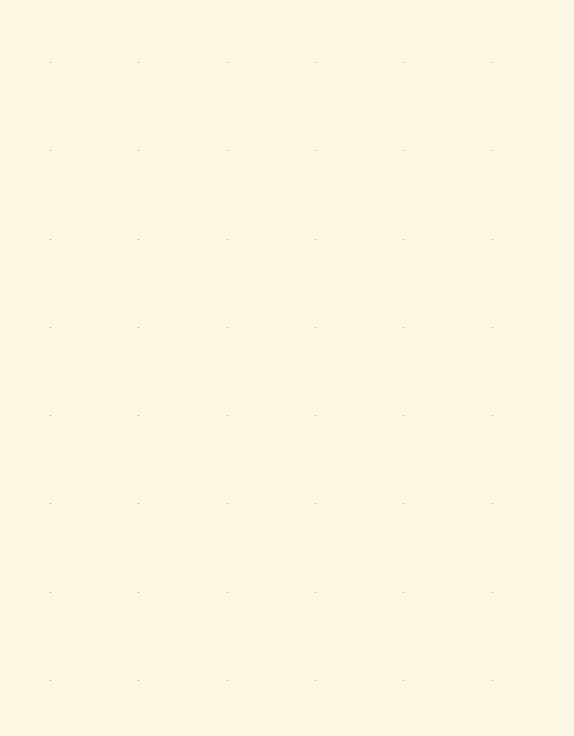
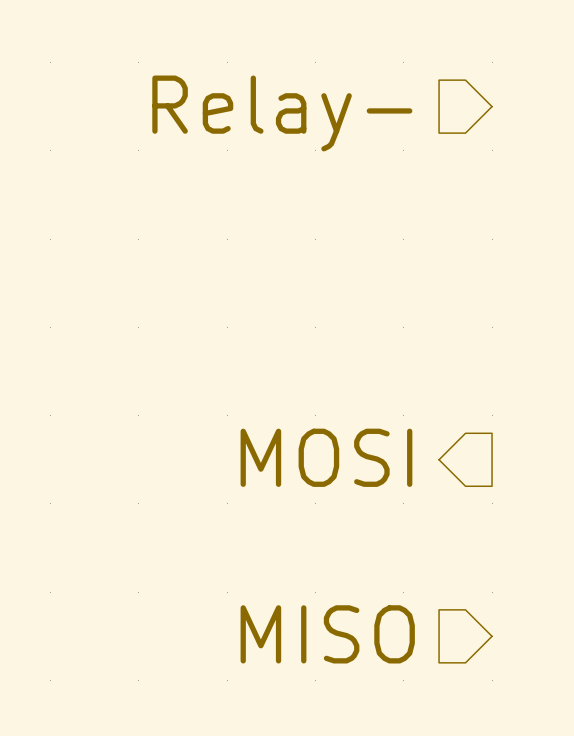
hierarchical label: none -> Relay- (282, 113)
hierarchical label: none -> MOSI (326, 457)
hierarchical label: none -> MISO (327, 634)

